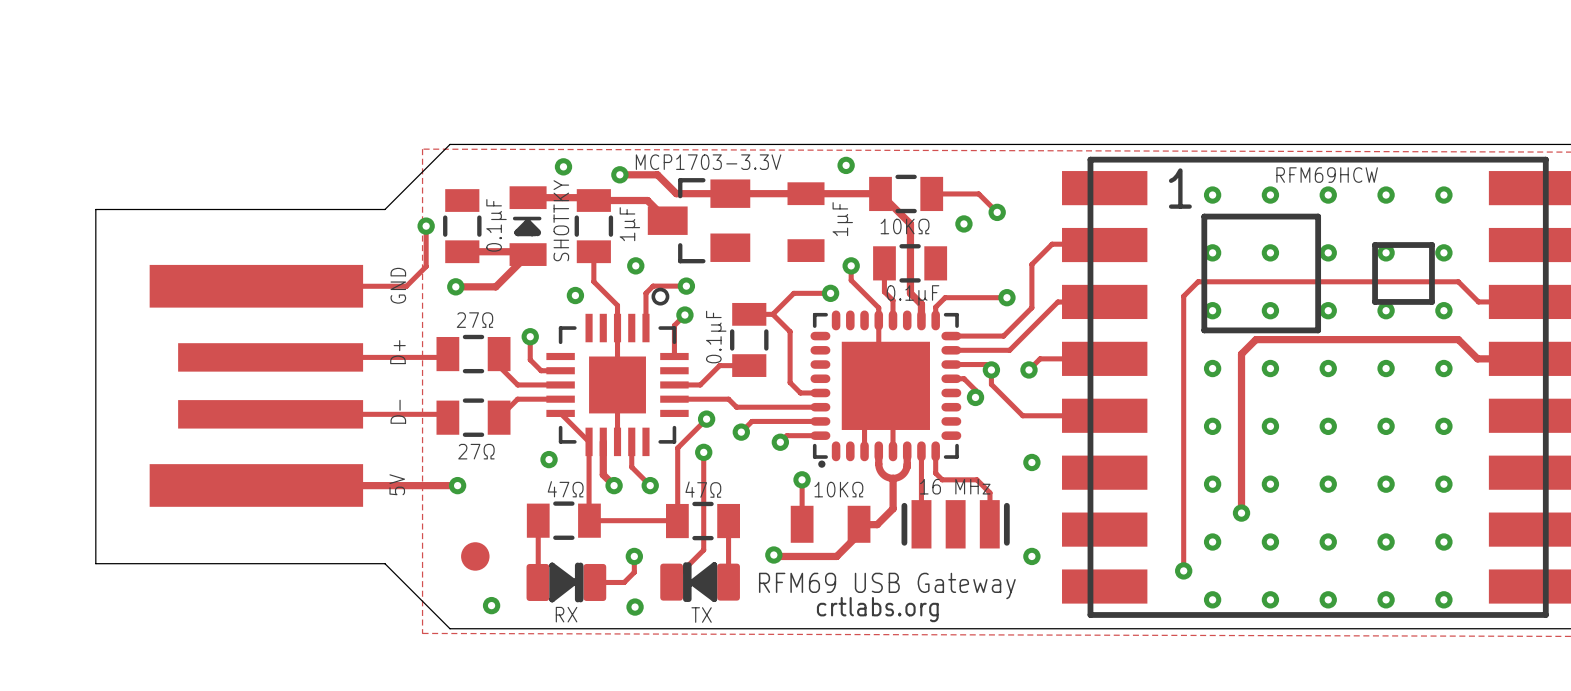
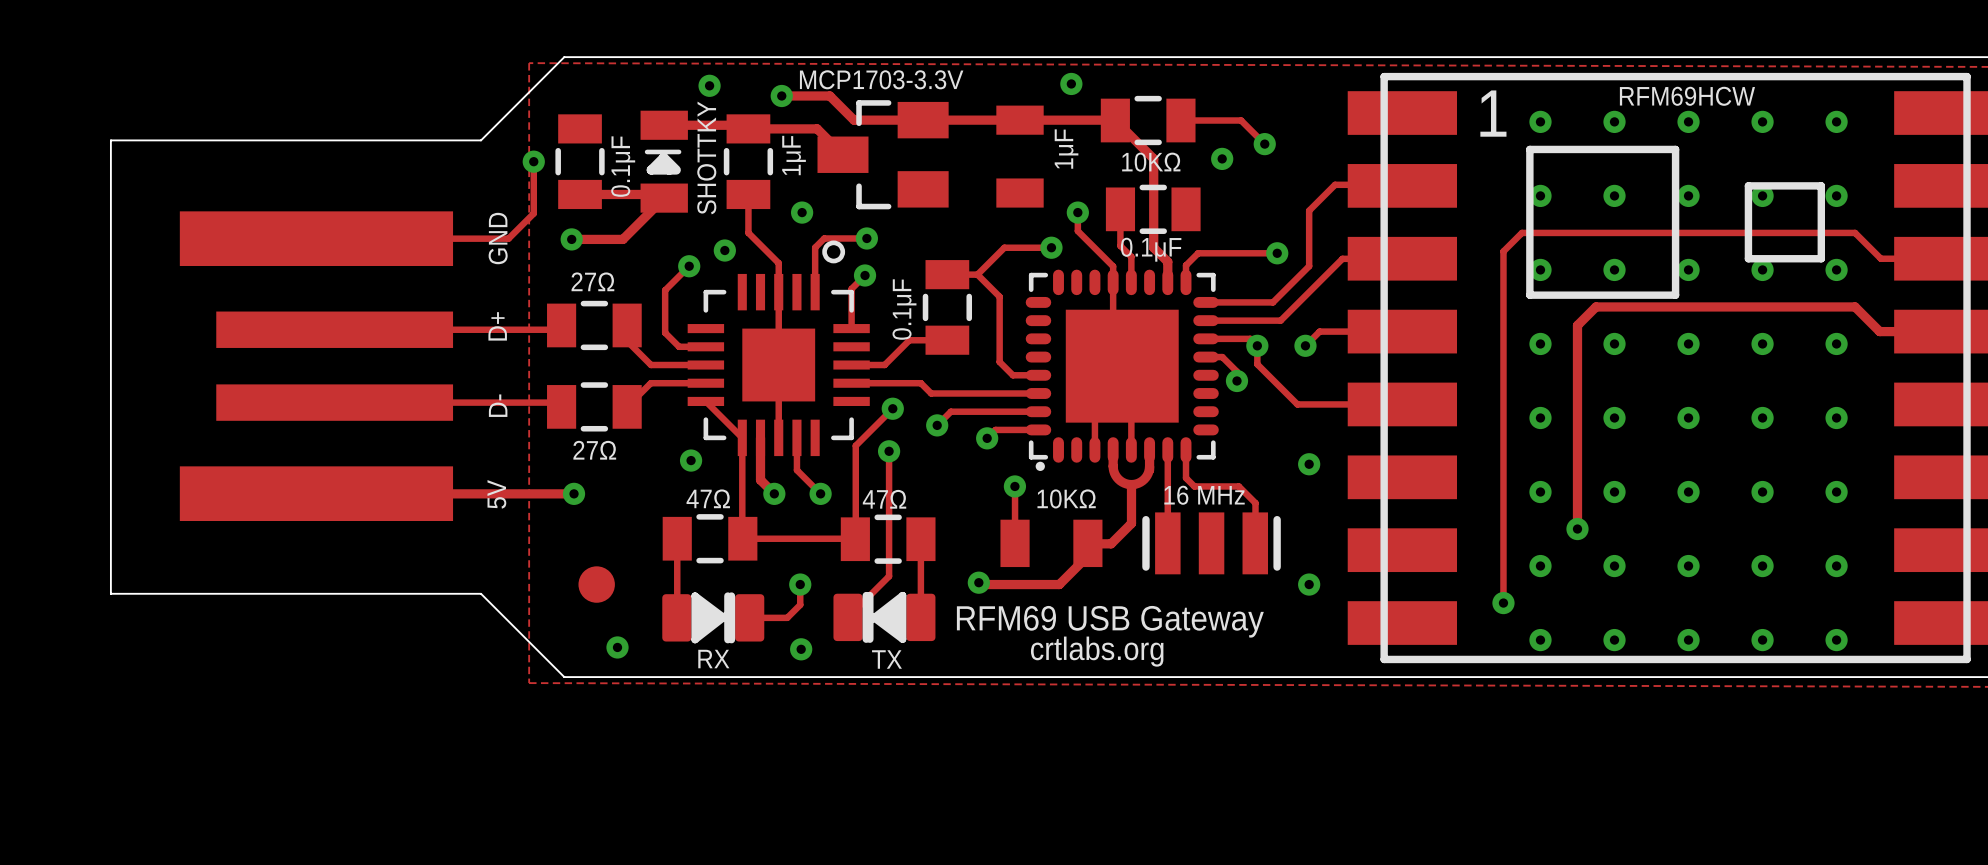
track: (530, 336) (530, 359) (541, 370) -> (689, 266) (665, 290) (665, 332) (680, 346)
via position: (530, 336) -> (689, 266)

